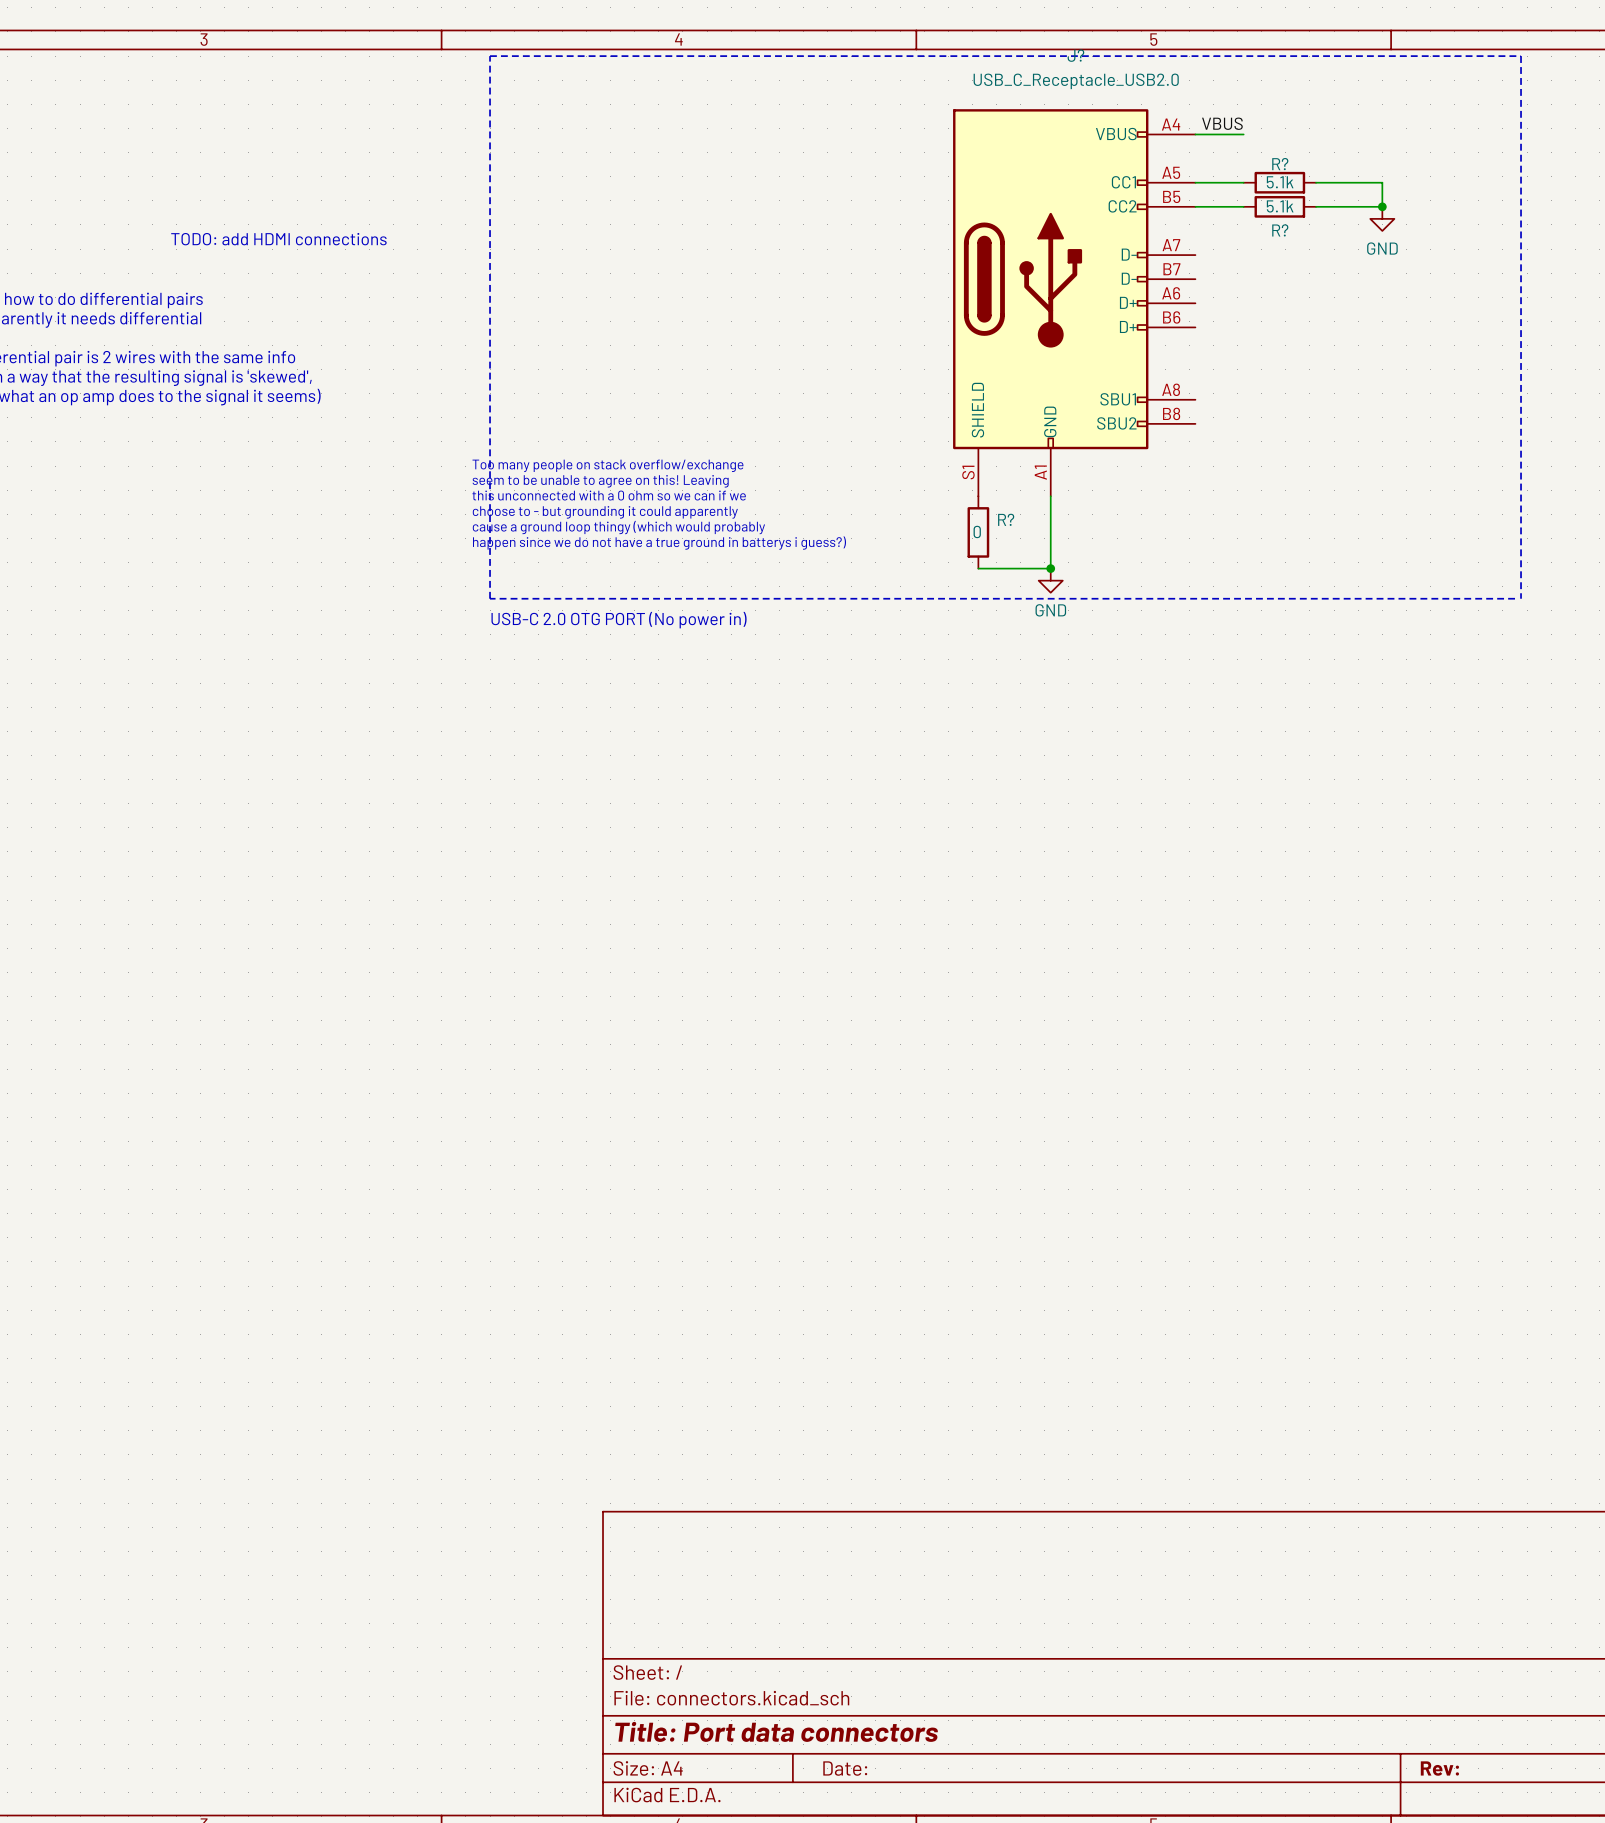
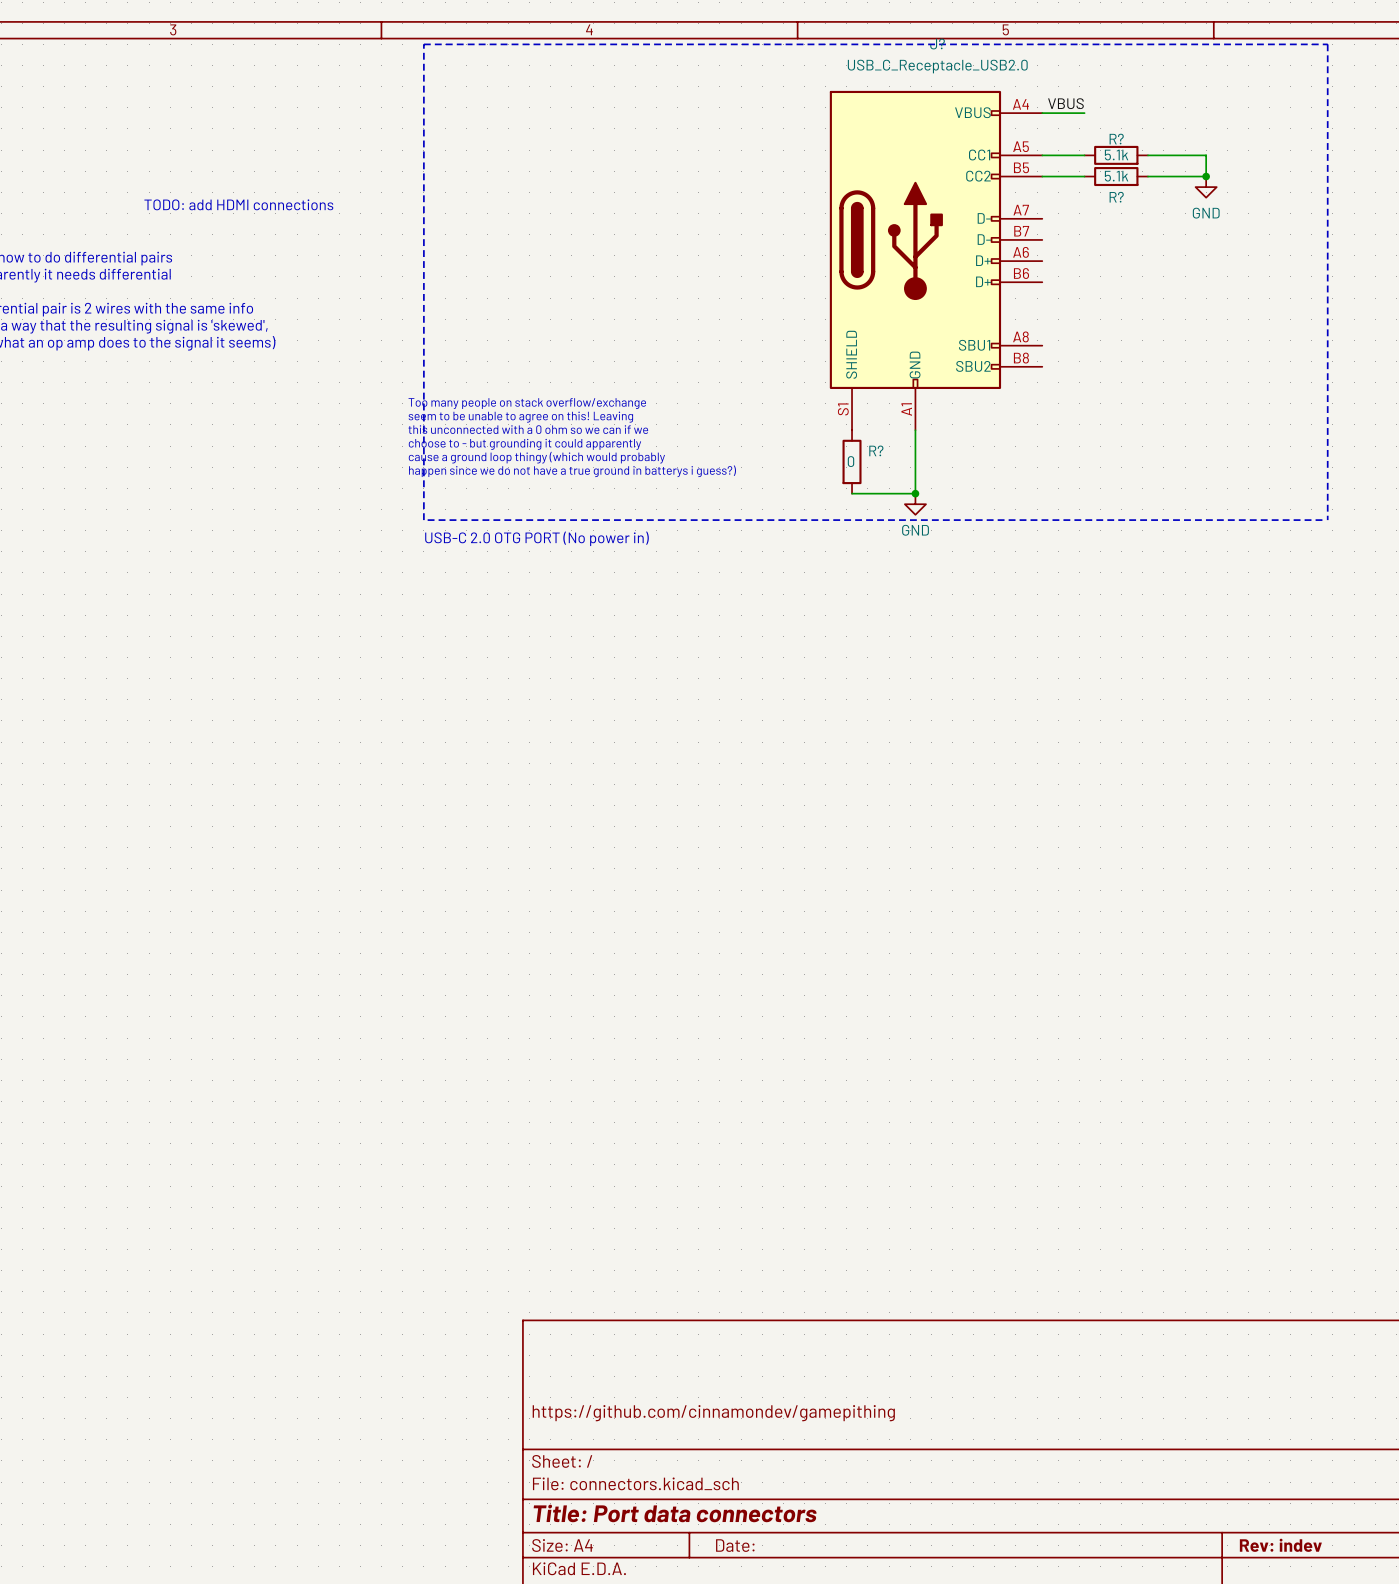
title block: none -> https://github.com/cinnamondev/gamepithing (713, 1413)
title block: Rev: (1439, 1768) -> Rev: indev (1280, 1545)

